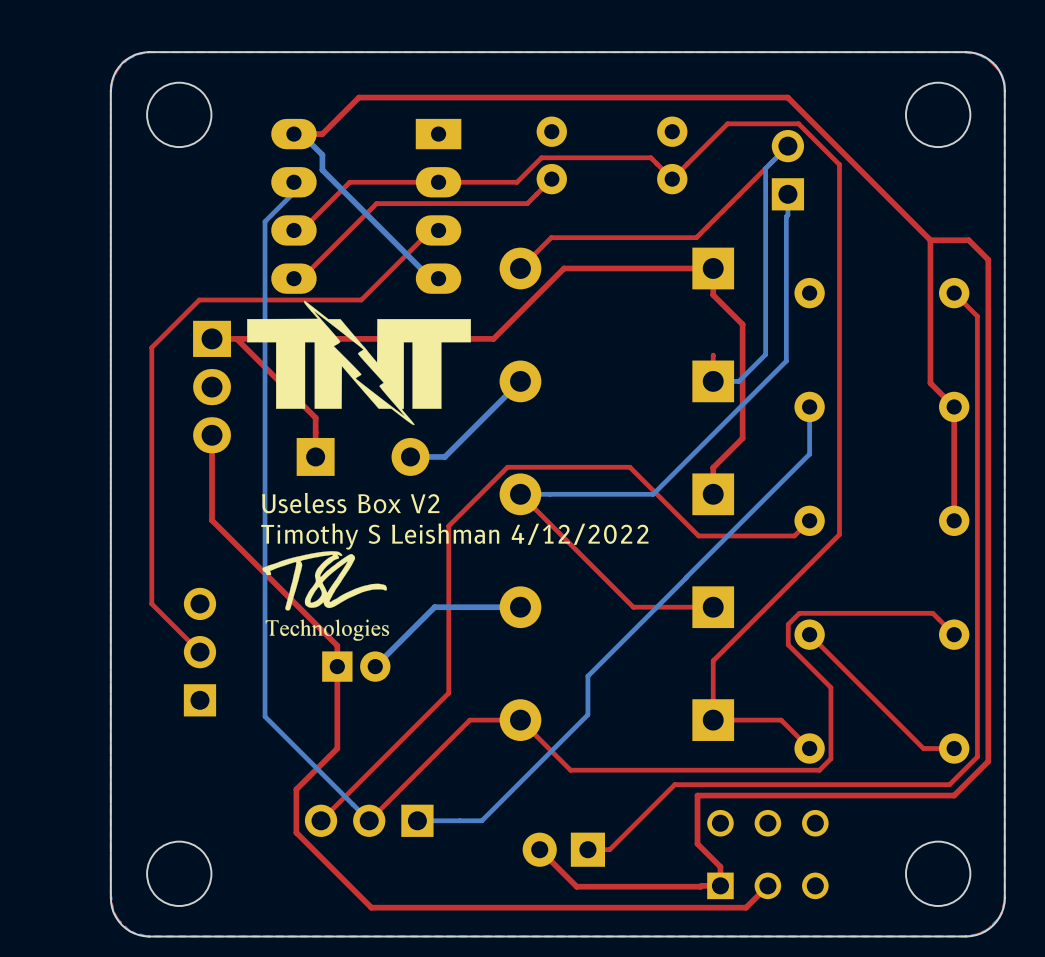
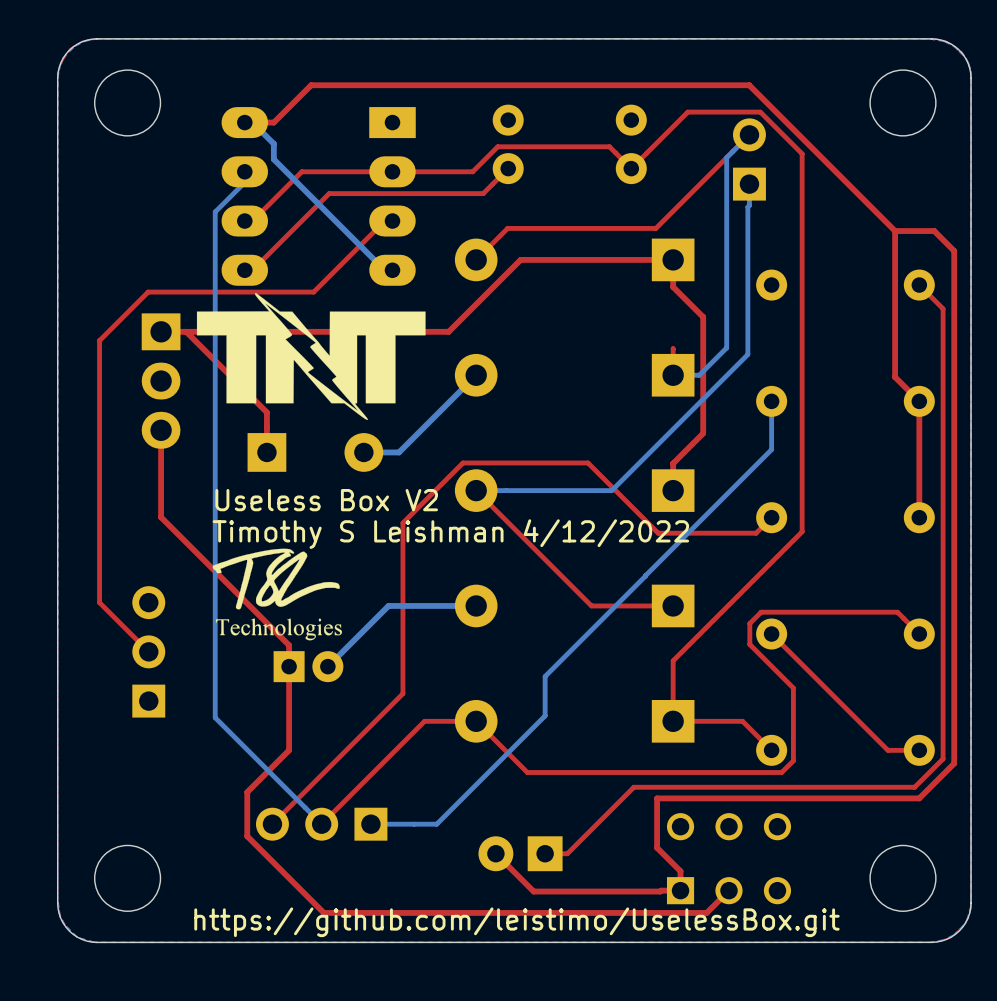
text: none -> https://github.com/leistimo/UselessBox.git (516, 922)

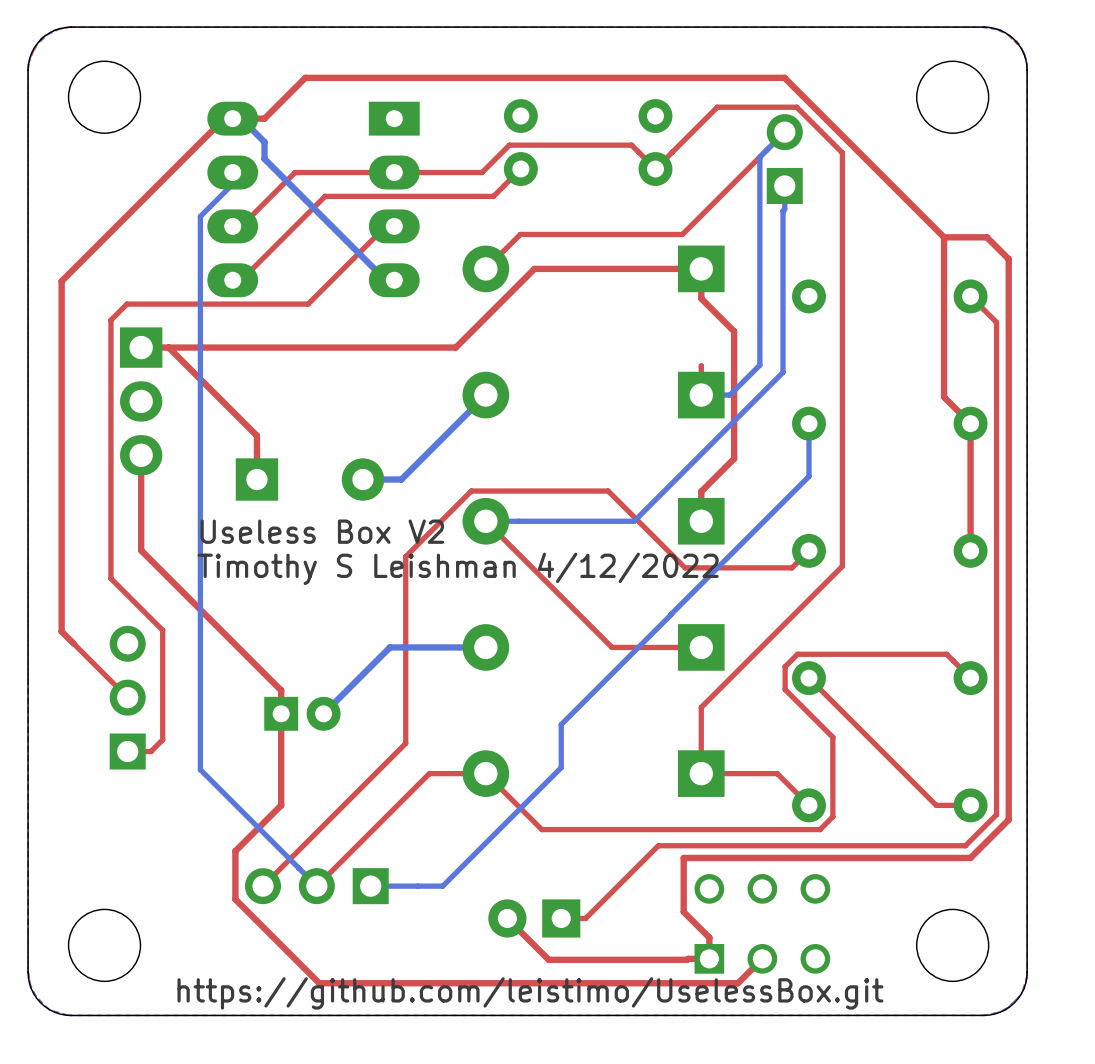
top track: none -> (232, 118) (224, 118) (61, 281) (61, 631) (73, 643)
drawing: [196, 292, 426, 420] -> none
top track: (133, 306) (99, 340) (99, 602) -> (110, 320) (110, 578) (162, 630) (162, 739) (151, 751) (127, 751)
drawing: [212, 548, 343, 641] -> none

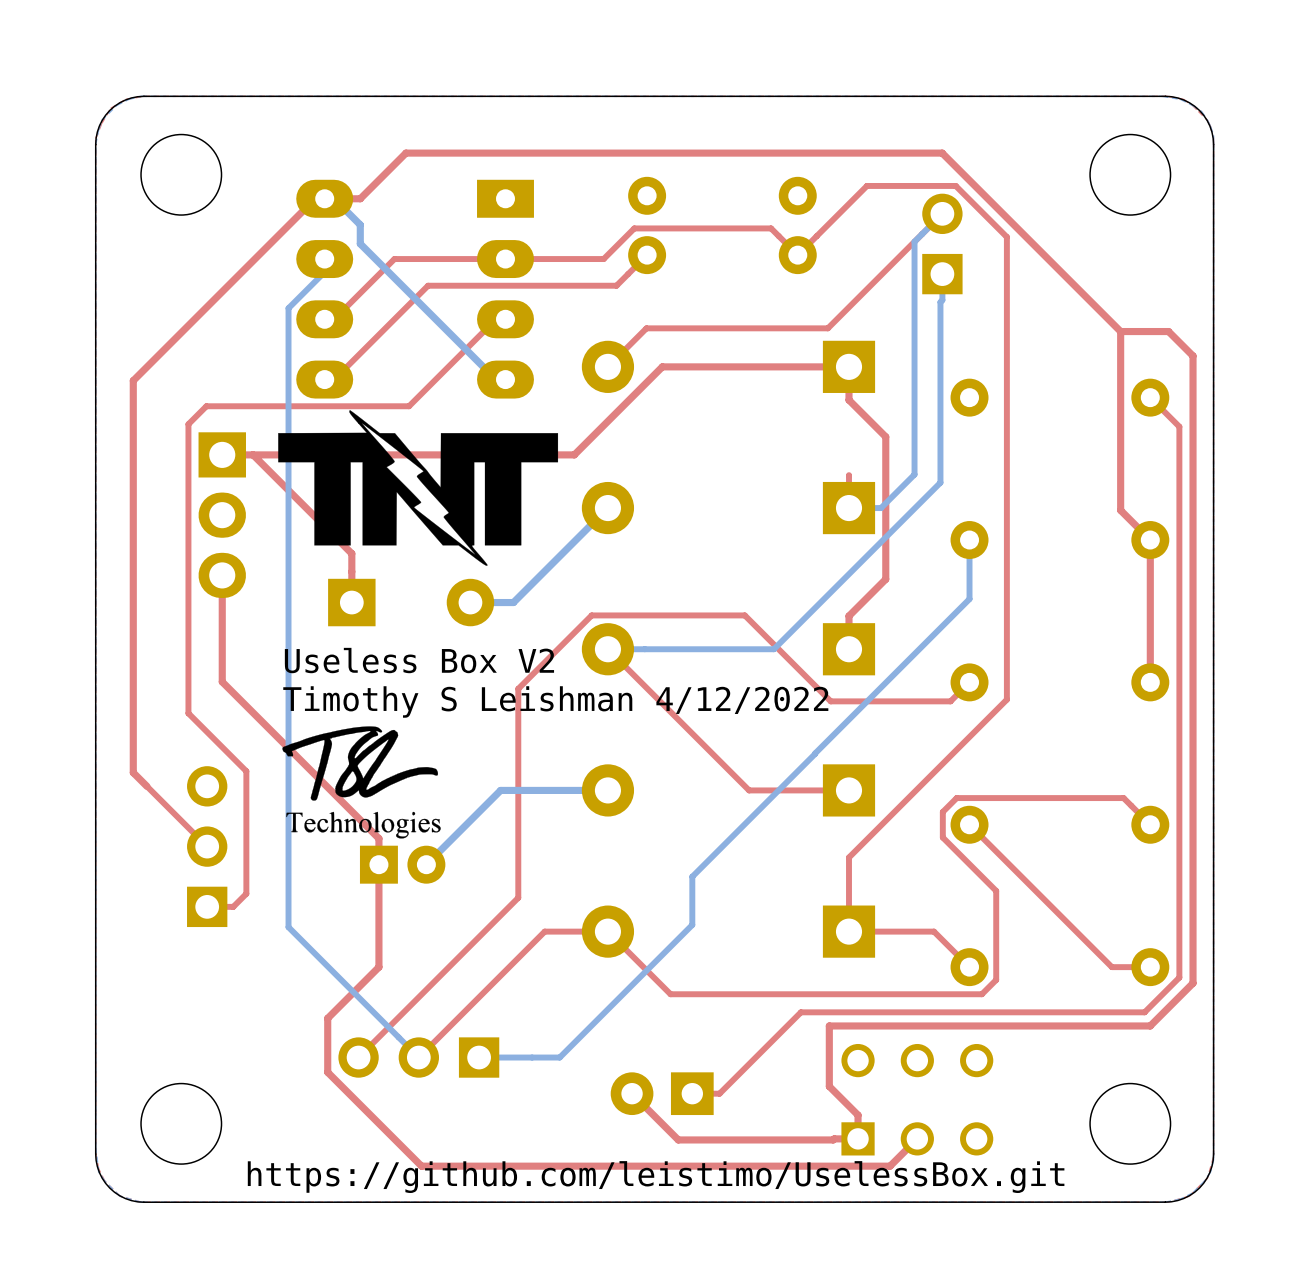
drawing: none -> [278, 410, 559, 566]
drawing: none -> [282, 726, 441, 839]

